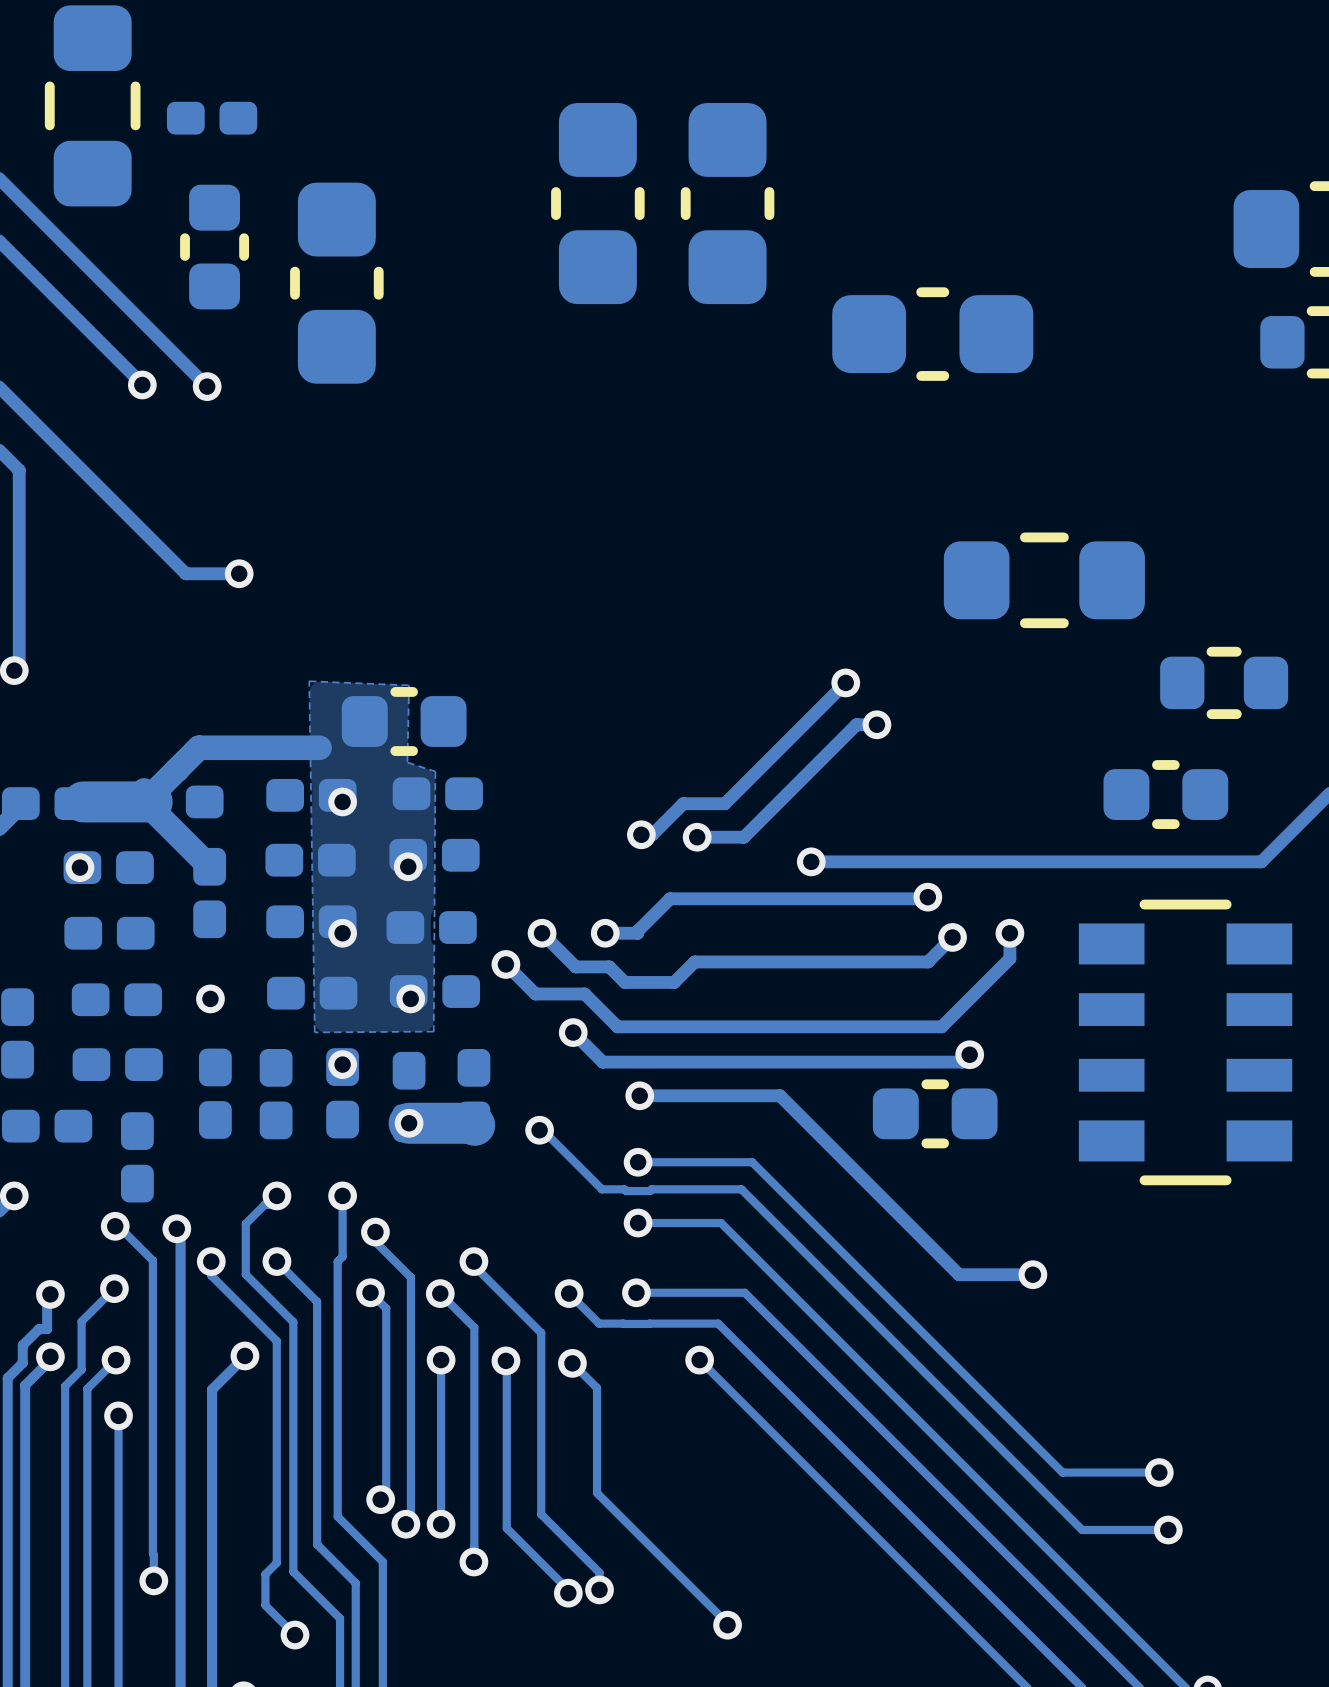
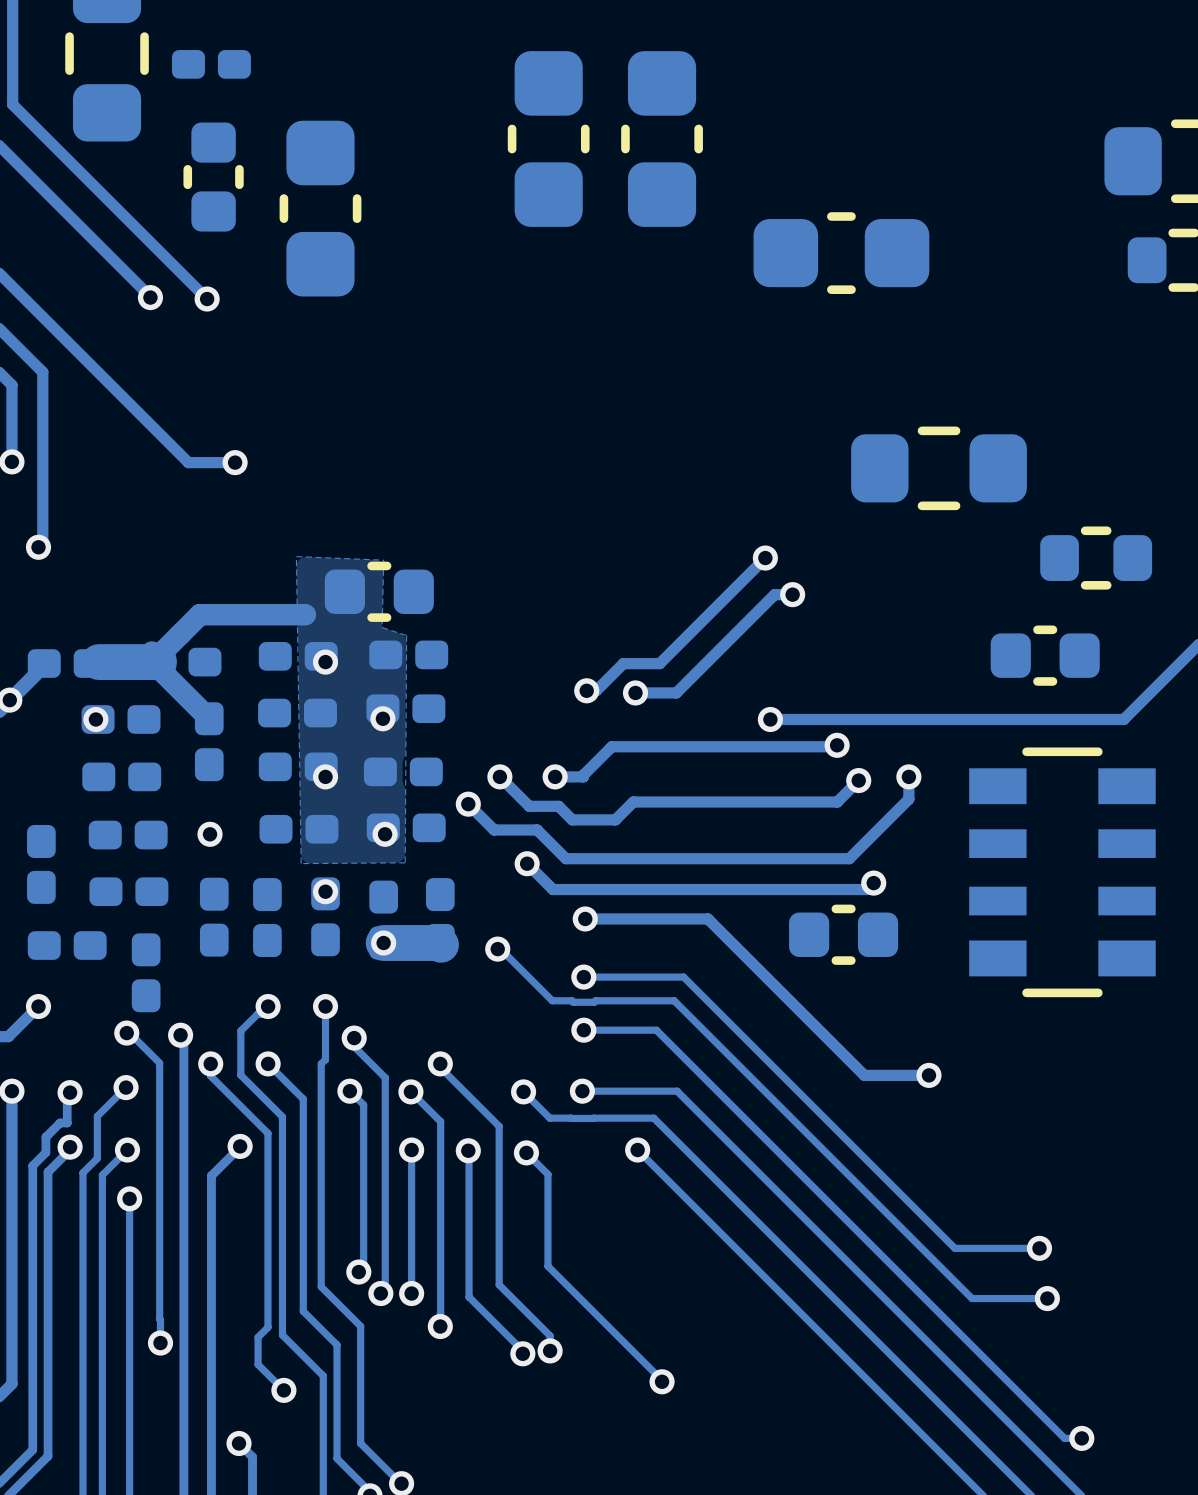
via position: (811, 861) -> (770, 719)
track: (1261, 861) (811, 861) -> (1128, 714) (1123, 719) (770, 719)

